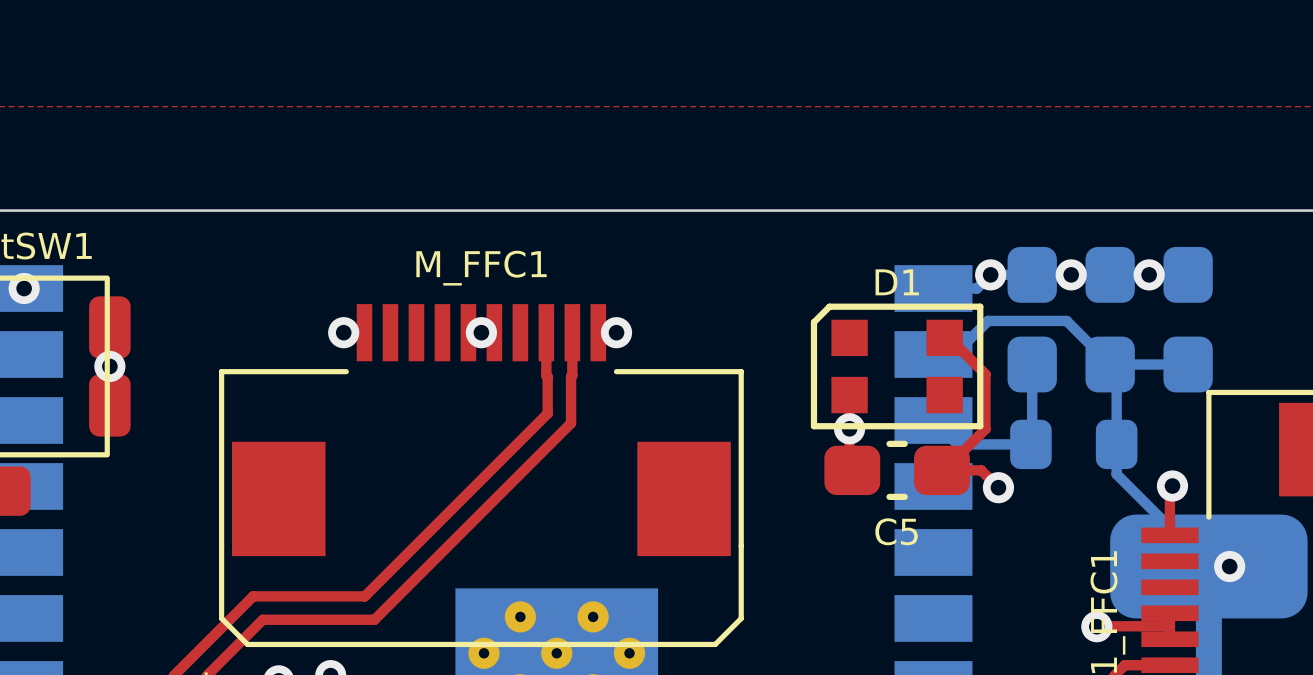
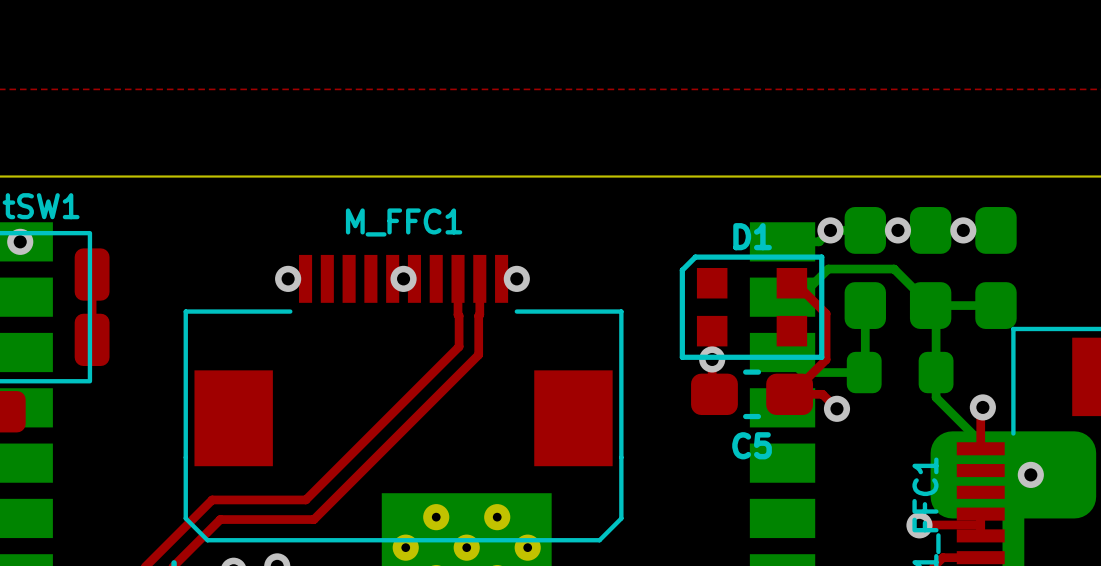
via: (109, 366) -> none

